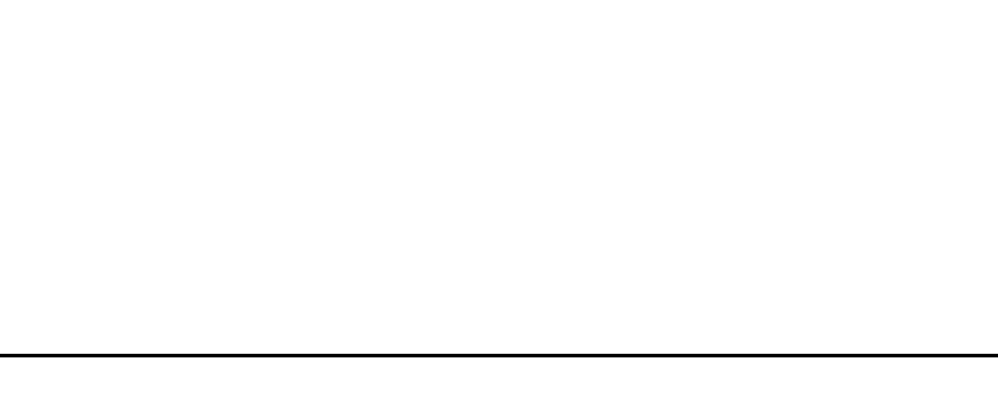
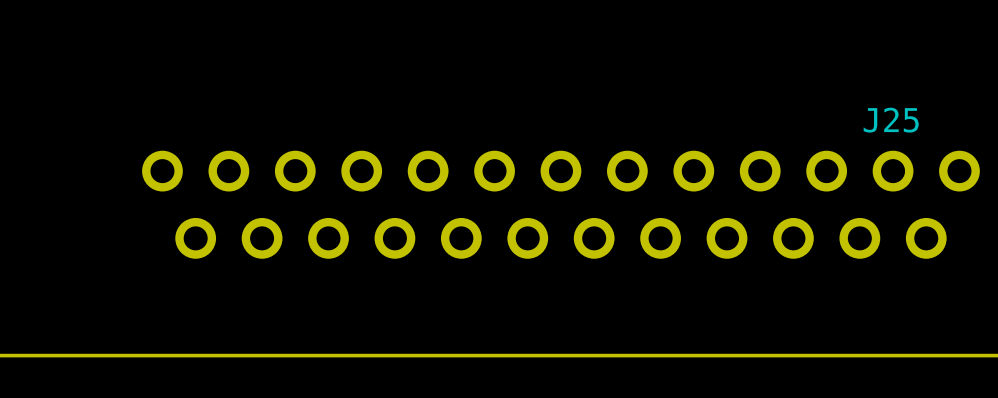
J25: none -> (560, 204)

